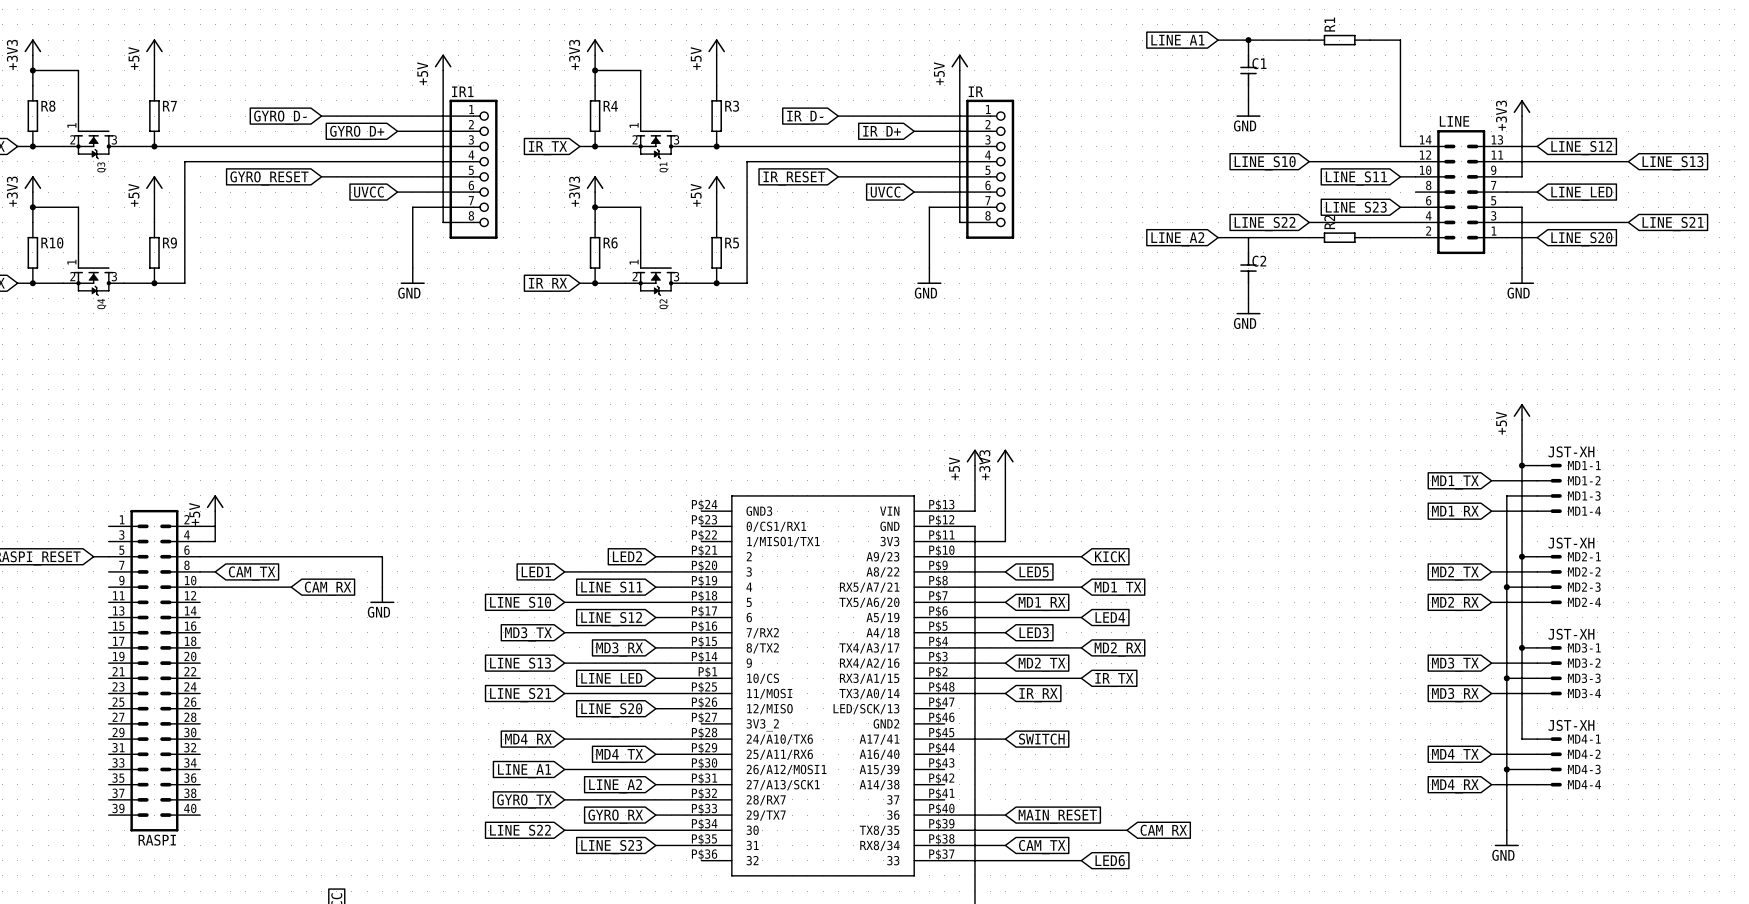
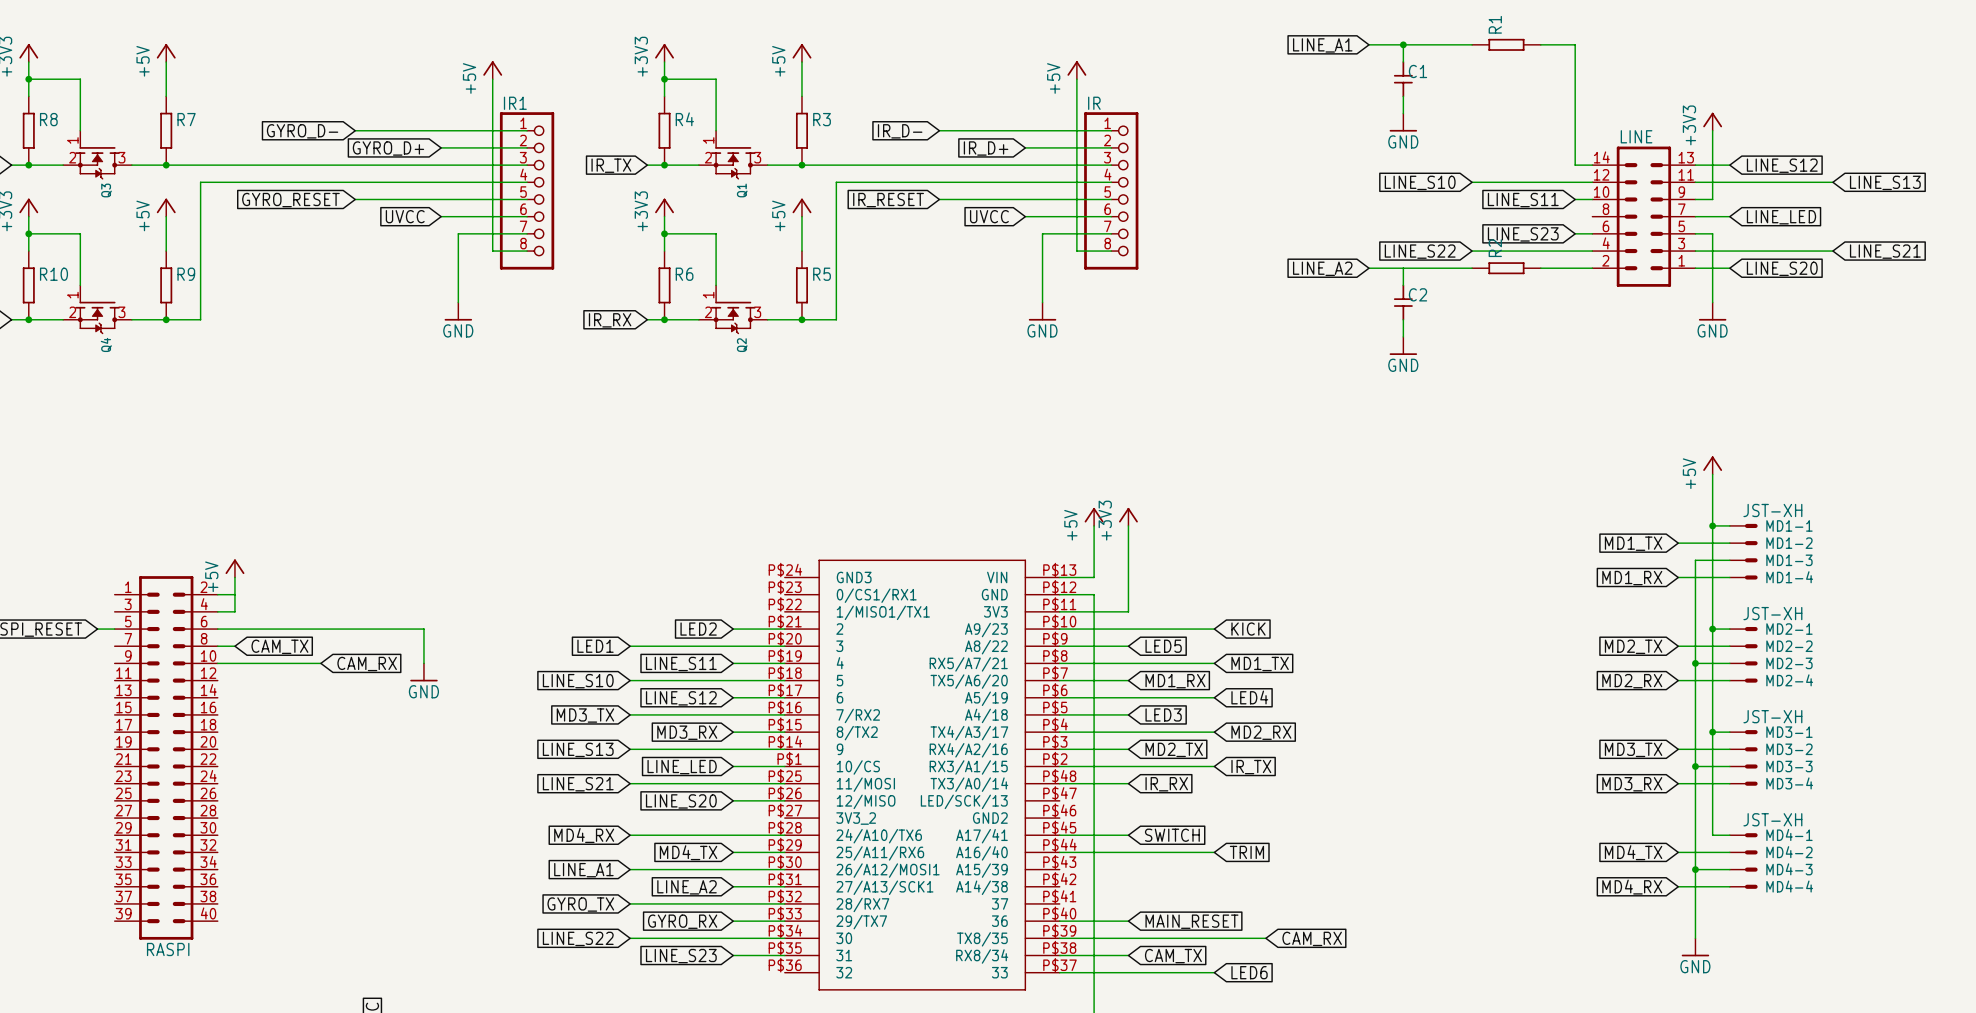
wire: none -> (1059, 852) (1214, 852)
global label: none -> TRIM (1246, 852)

